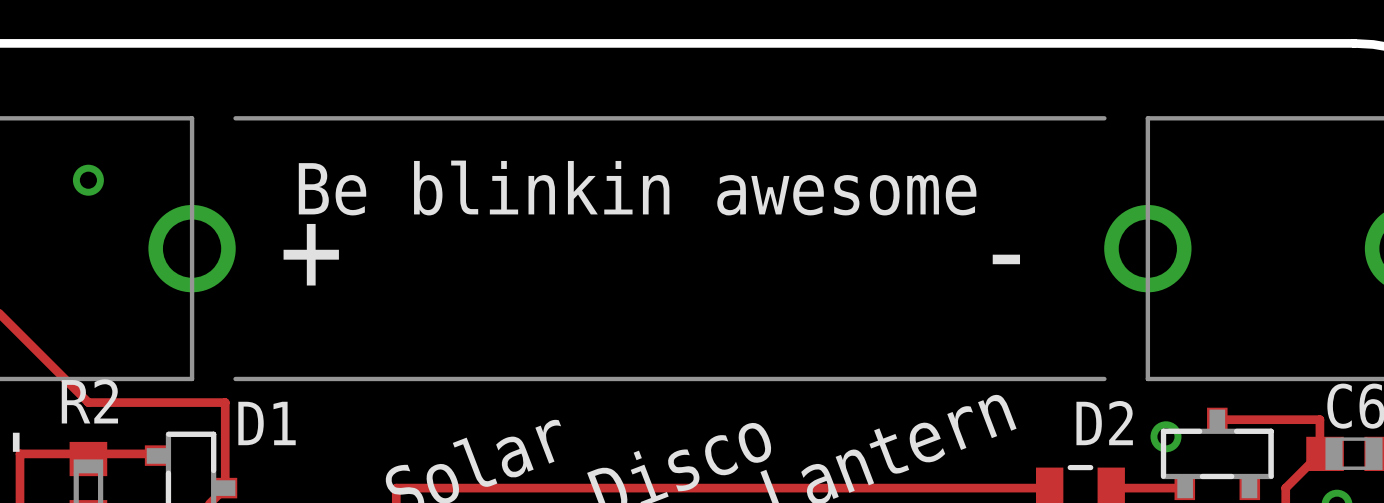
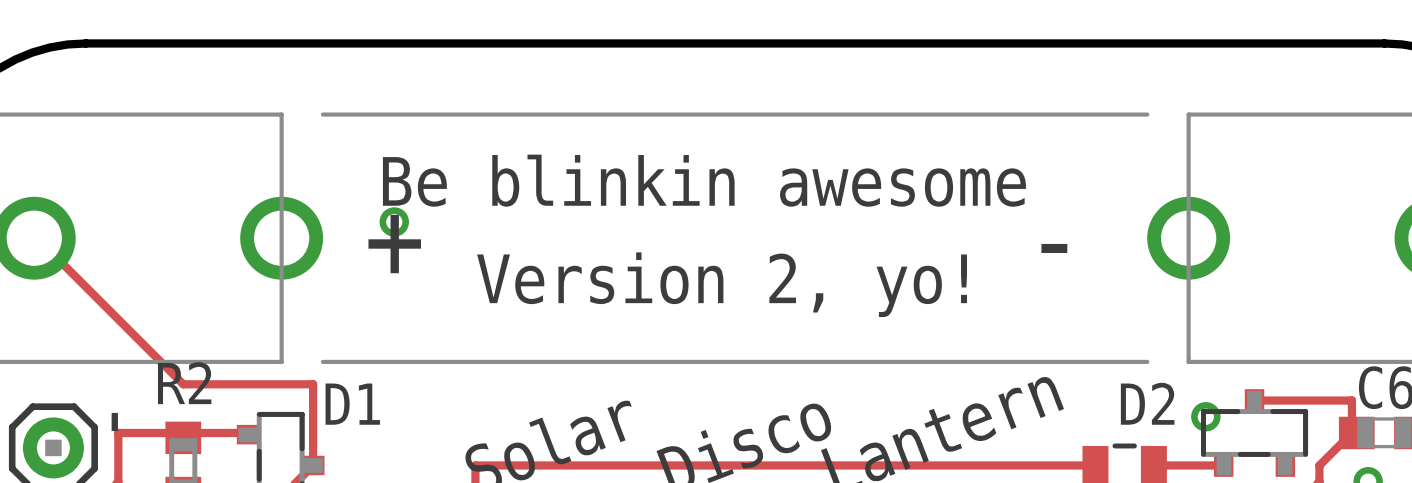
via: (88, 180) -> none
via: none -> (394, 221)
text: none -> Version 2, yo! (722, 284)

